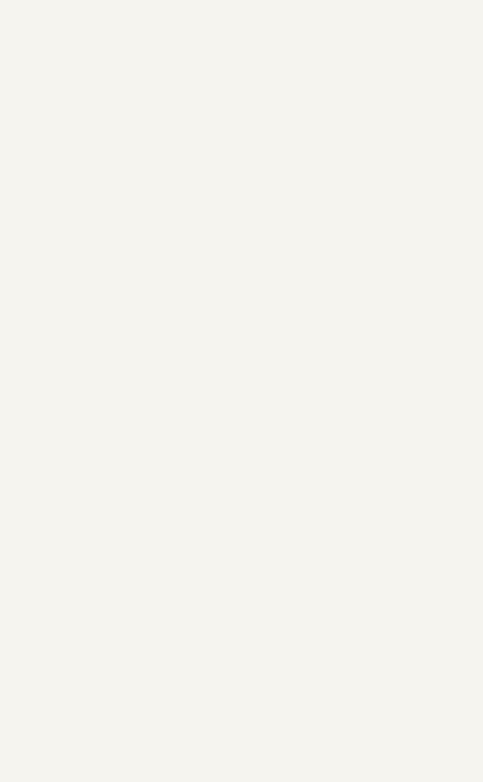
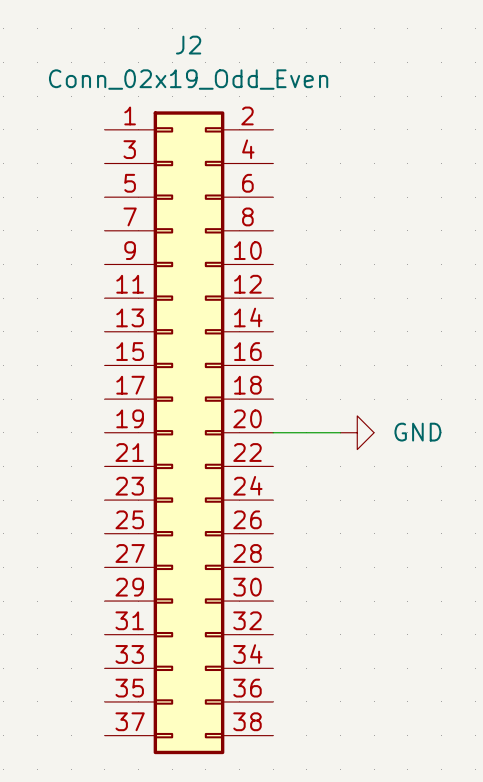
J2: none -> Conn_02x19_Odd_Even (189, 432)
wire: none -> (273, 432) (340, 432)
power symbol: none -> GND (357, 432)

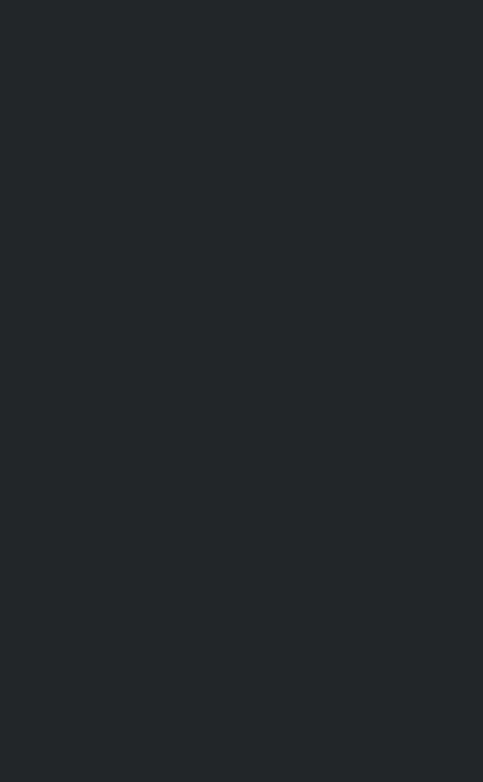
J2: Conn_02x19_Odd_Even (189, 432) -> none
wire: (273, 432) (340, 432) -> none
power symbol: GND (357, 432) -> none

